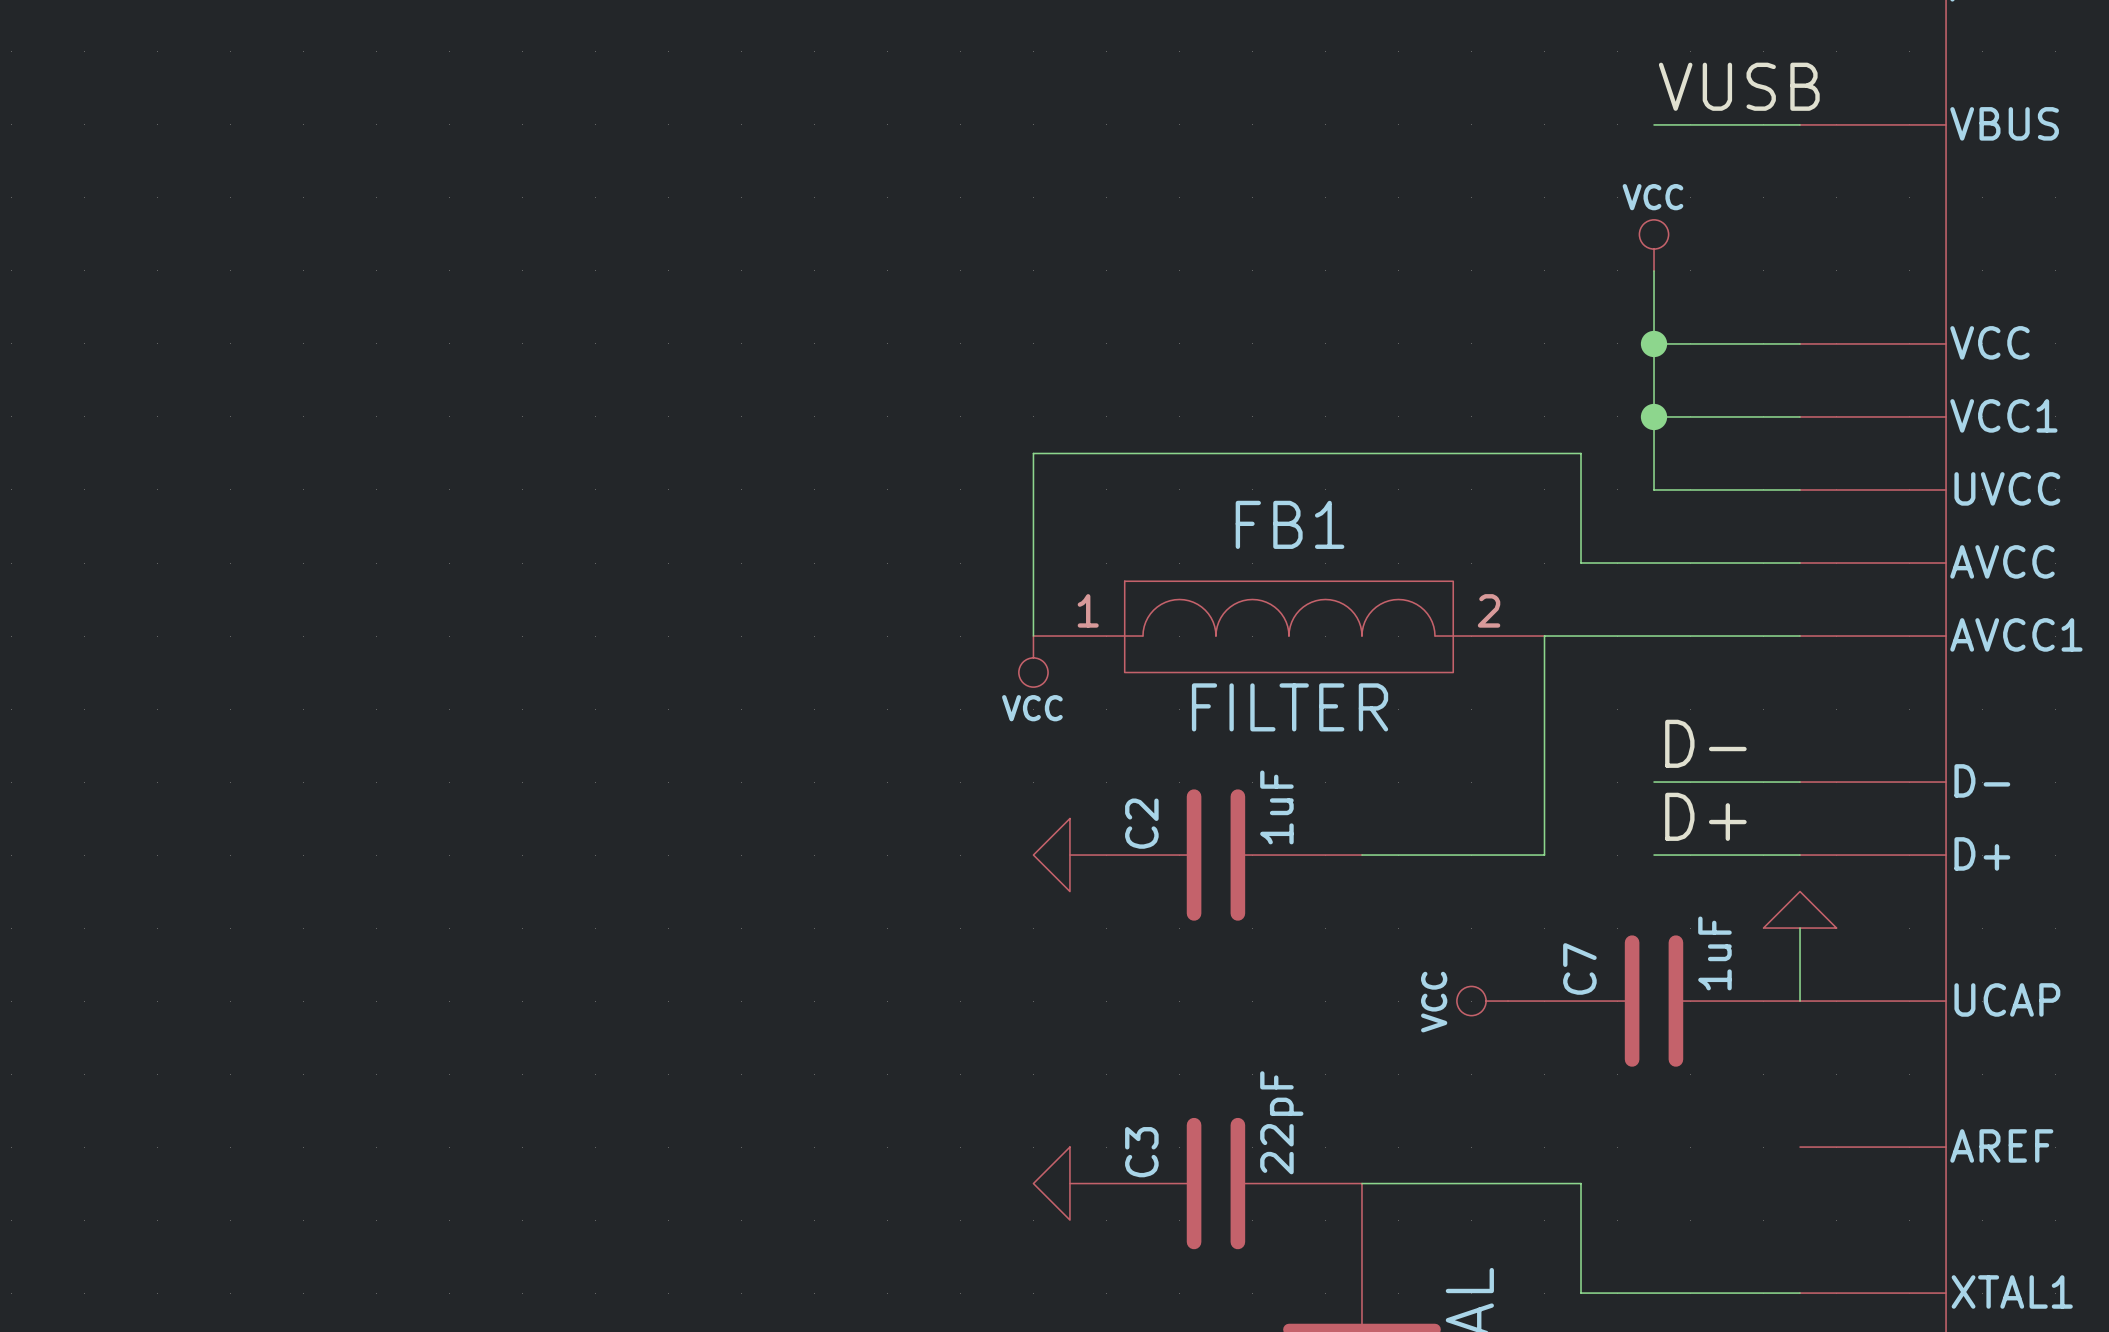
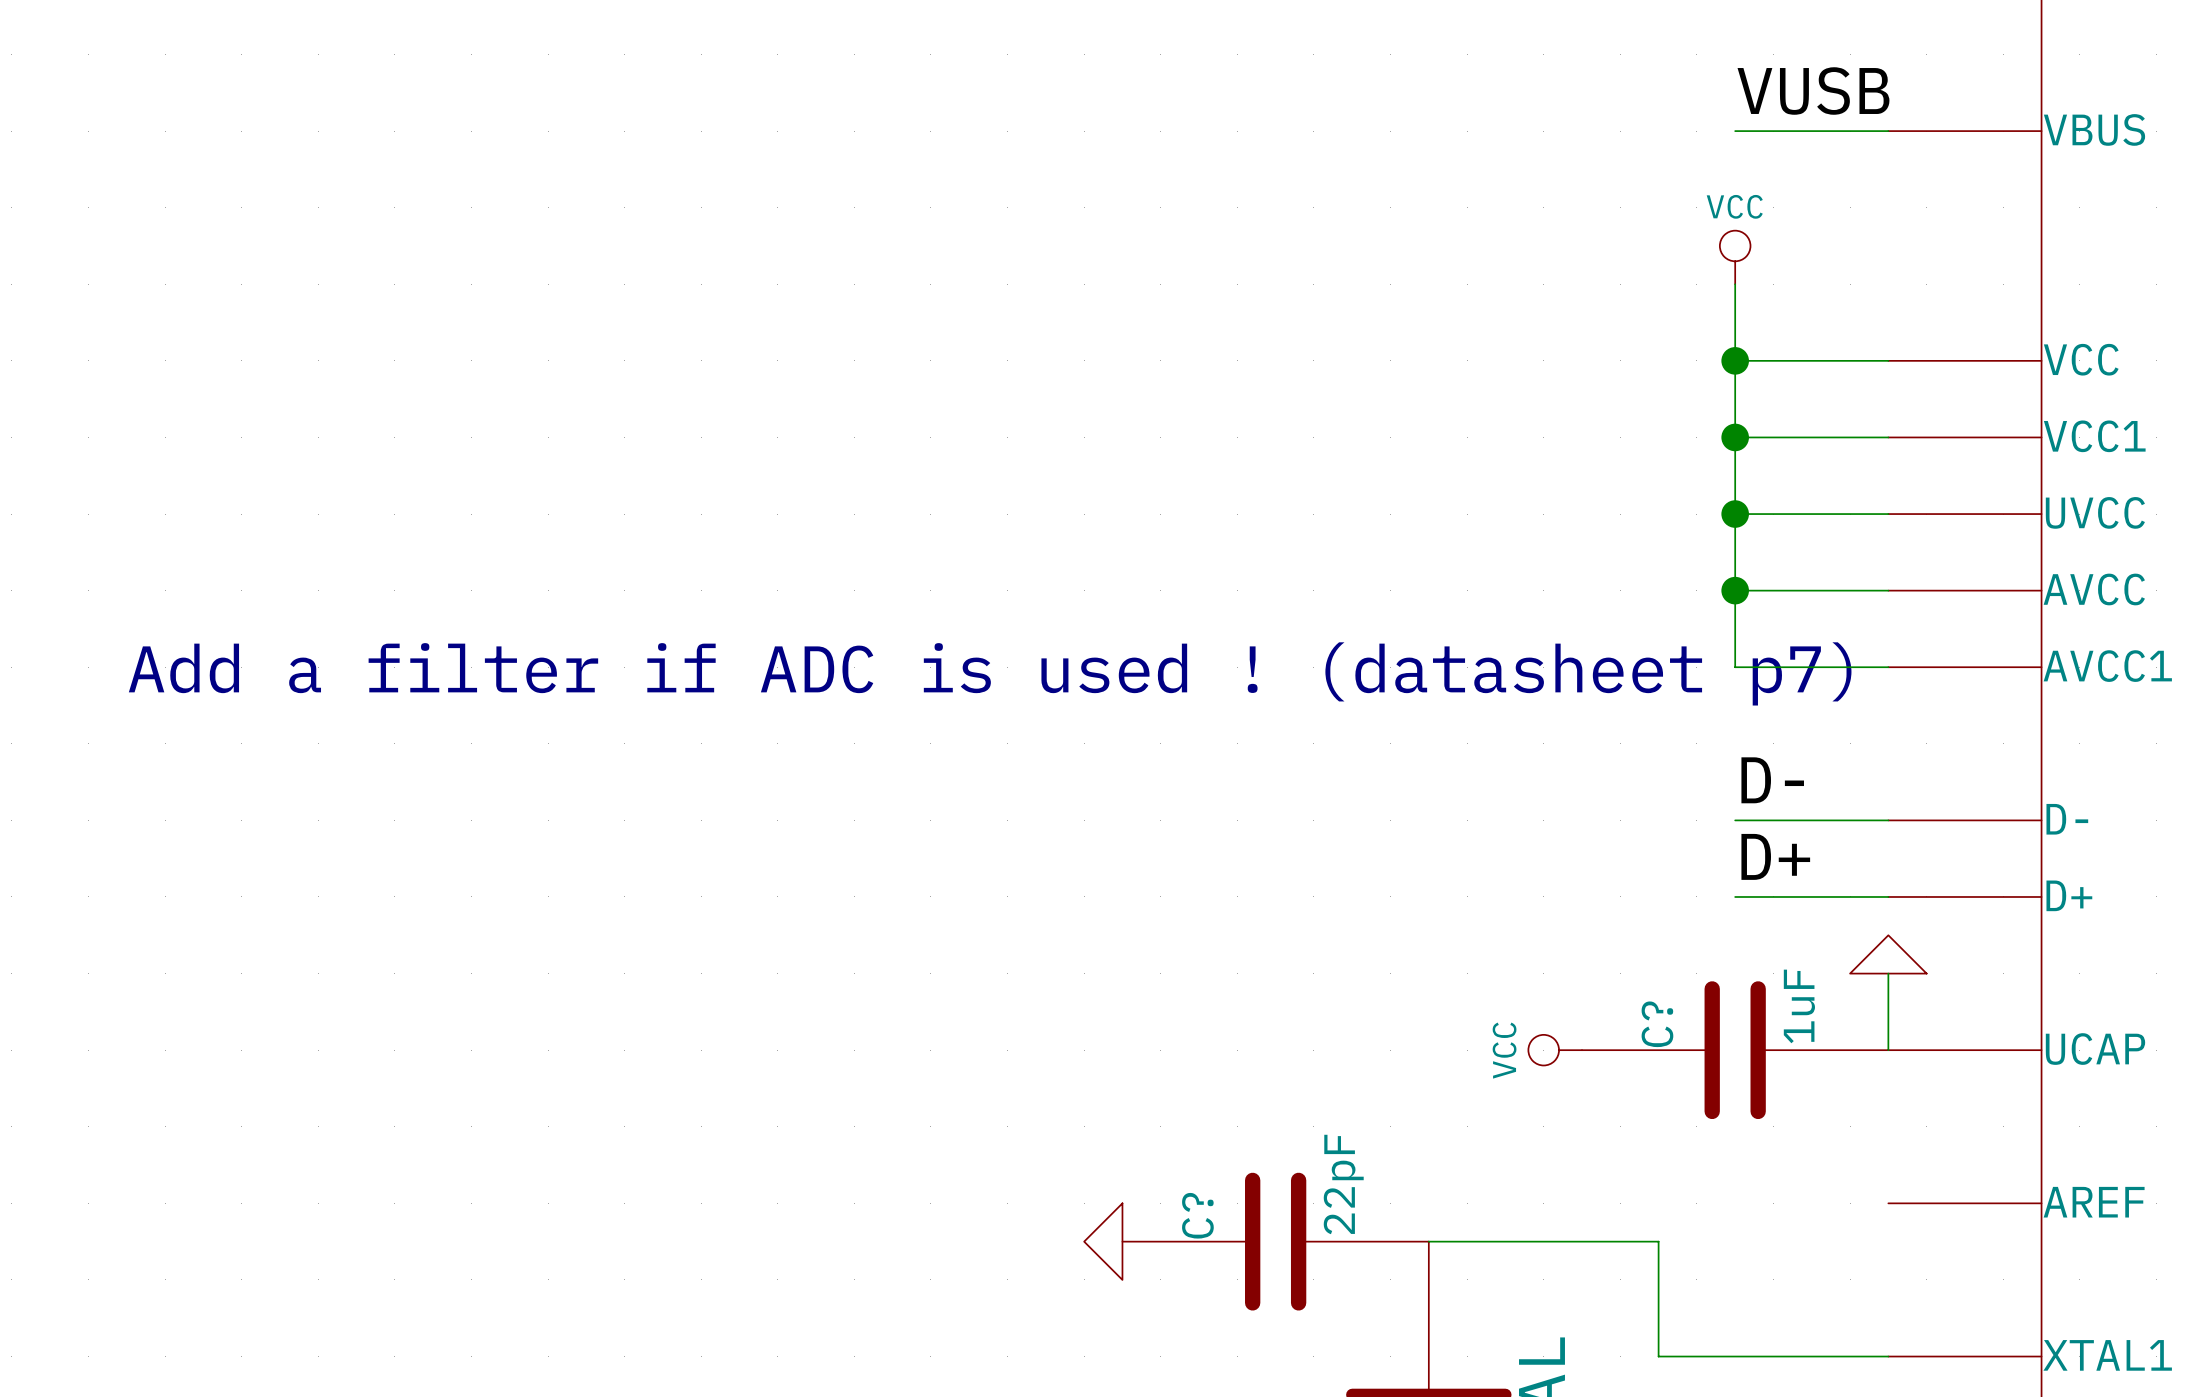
junction: none -> (1735, 514)
wire: (1654, 563) (1581, 563) (1581, 453) (1033, 453) (1033, 636) -> none
junction: none -> (1735, 590)
FB1: FILTER (1288, 626) -> none
wire: (1654, 636) (1544, 636) (1544, 855) (1361, 855) -> (1735, 667) (1735, 514)
text: none -> Add a filter if ADC is used ! (datasheet p7) (990, 673)
power symbol: VCC (1033, 661) -> none
power symbol: (1051, 855) -> none
C2: 1uF (1215, 855) -> none
C7 name: C7 (1579, 968) -> C? (1657, 1024)
C3 name: C3 (1141, 1152) -> C? (1197, 1215)

